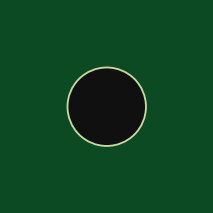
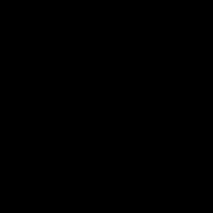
part: (106, 106) -> none

